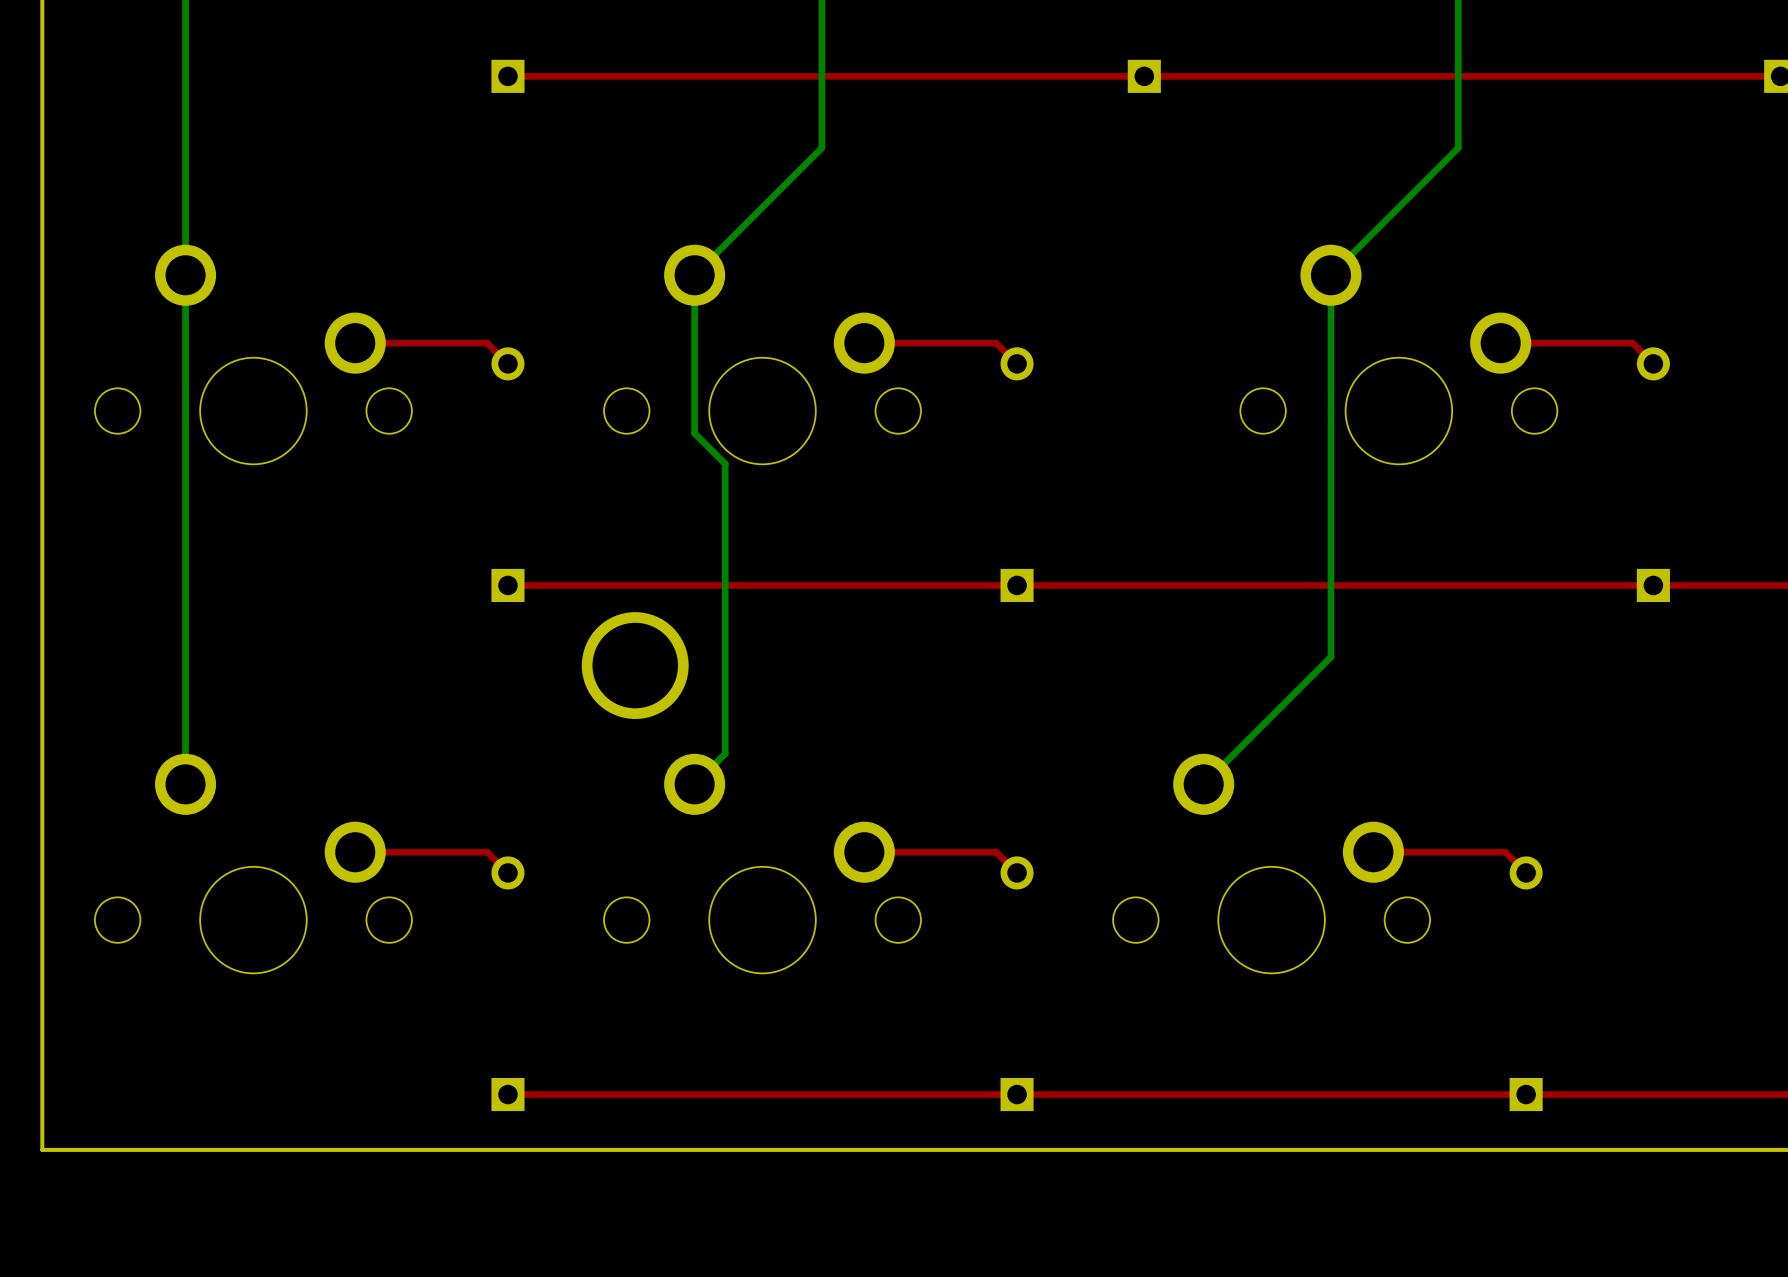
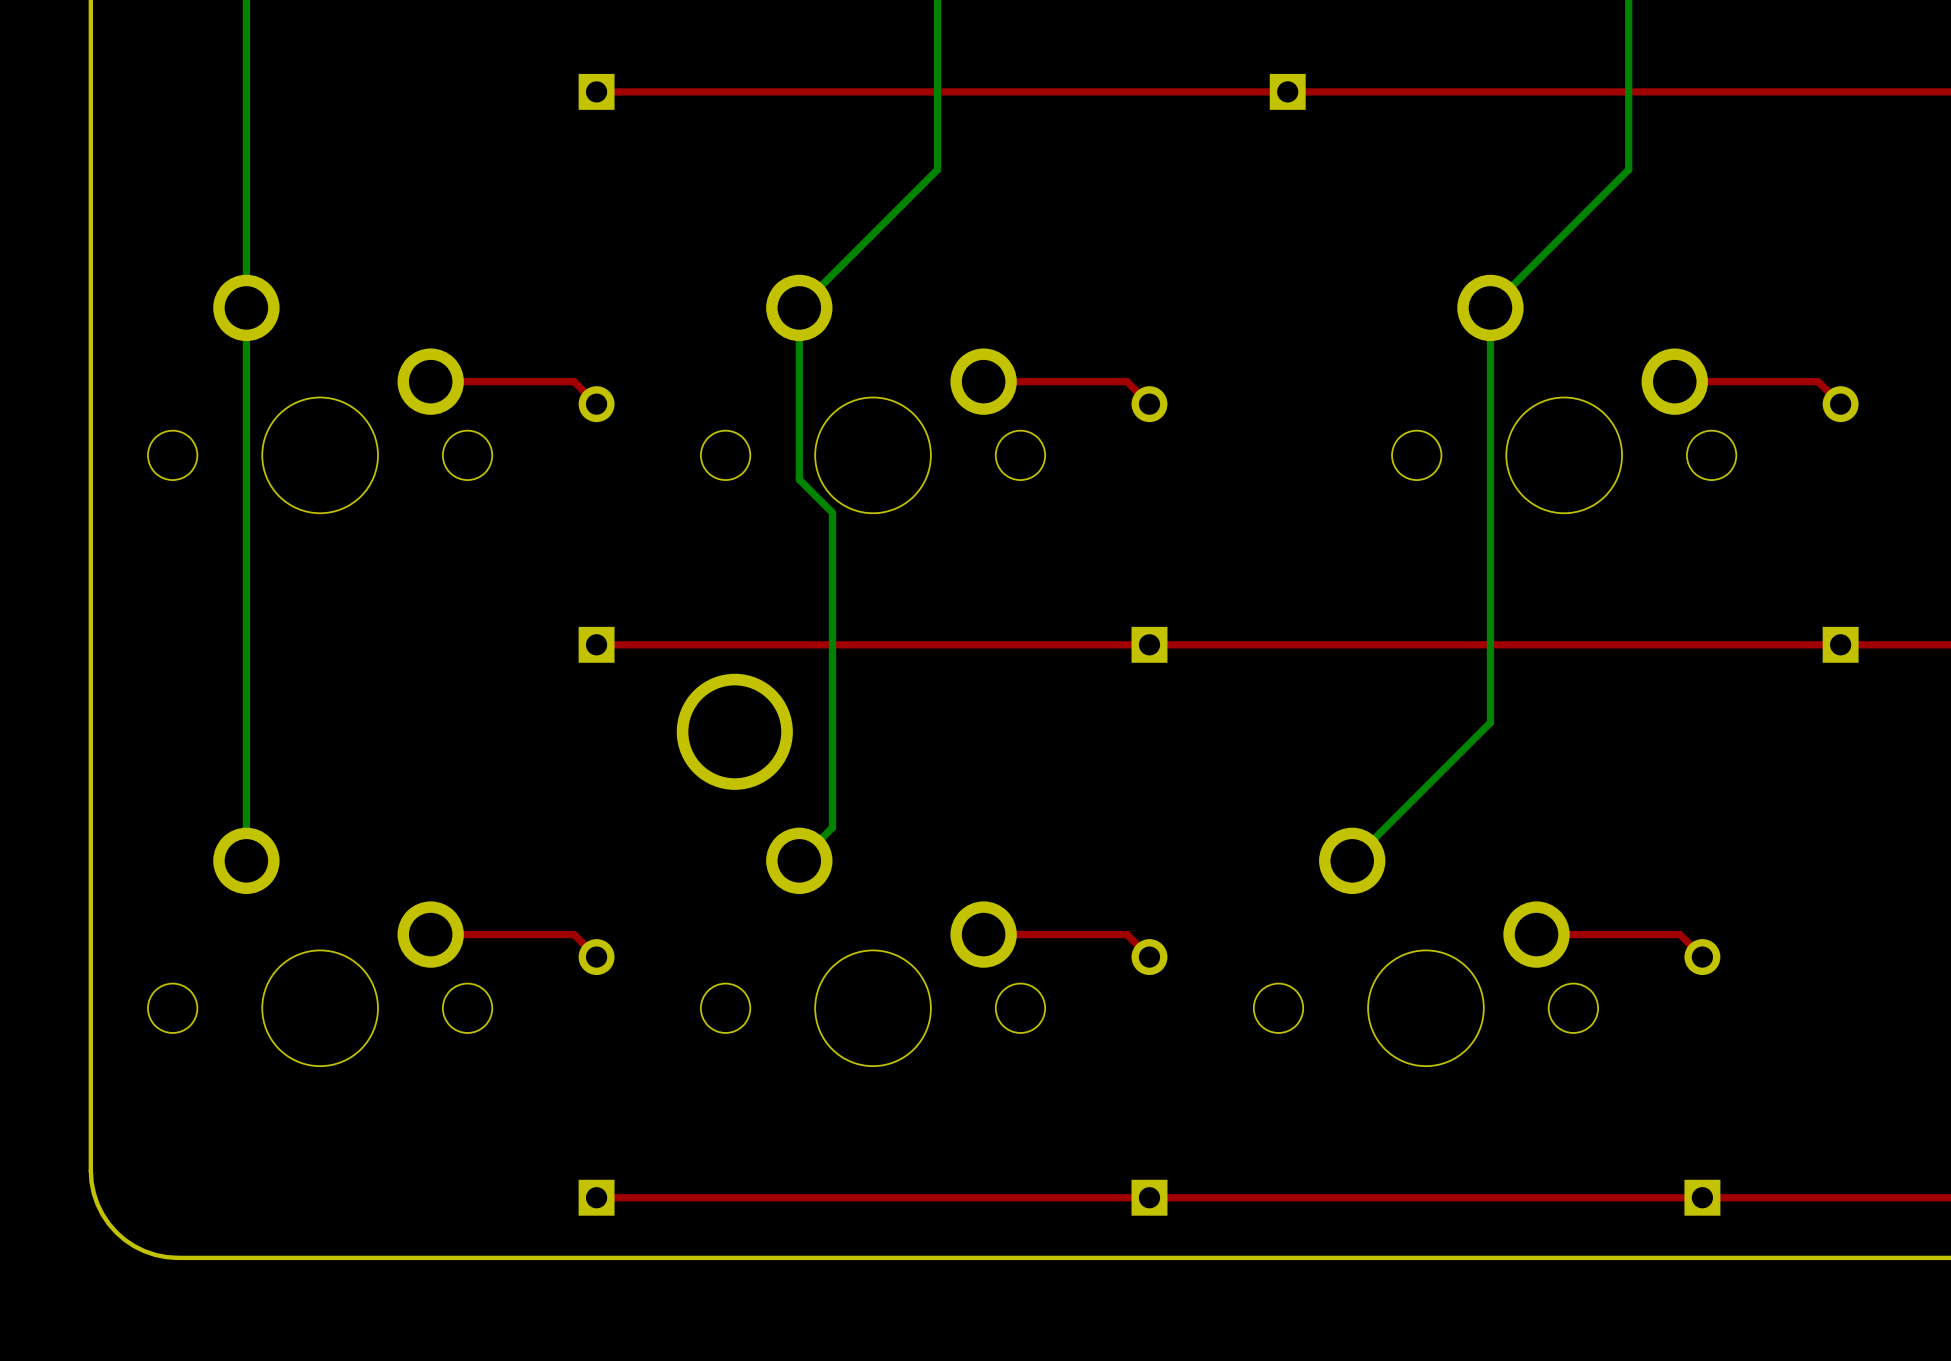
board edge: (42, 1069) (42, 1149) (122, 1149) -> (90, 1170) (97, 1204) (116, 1232) (144, 1251) (177, 1257)

